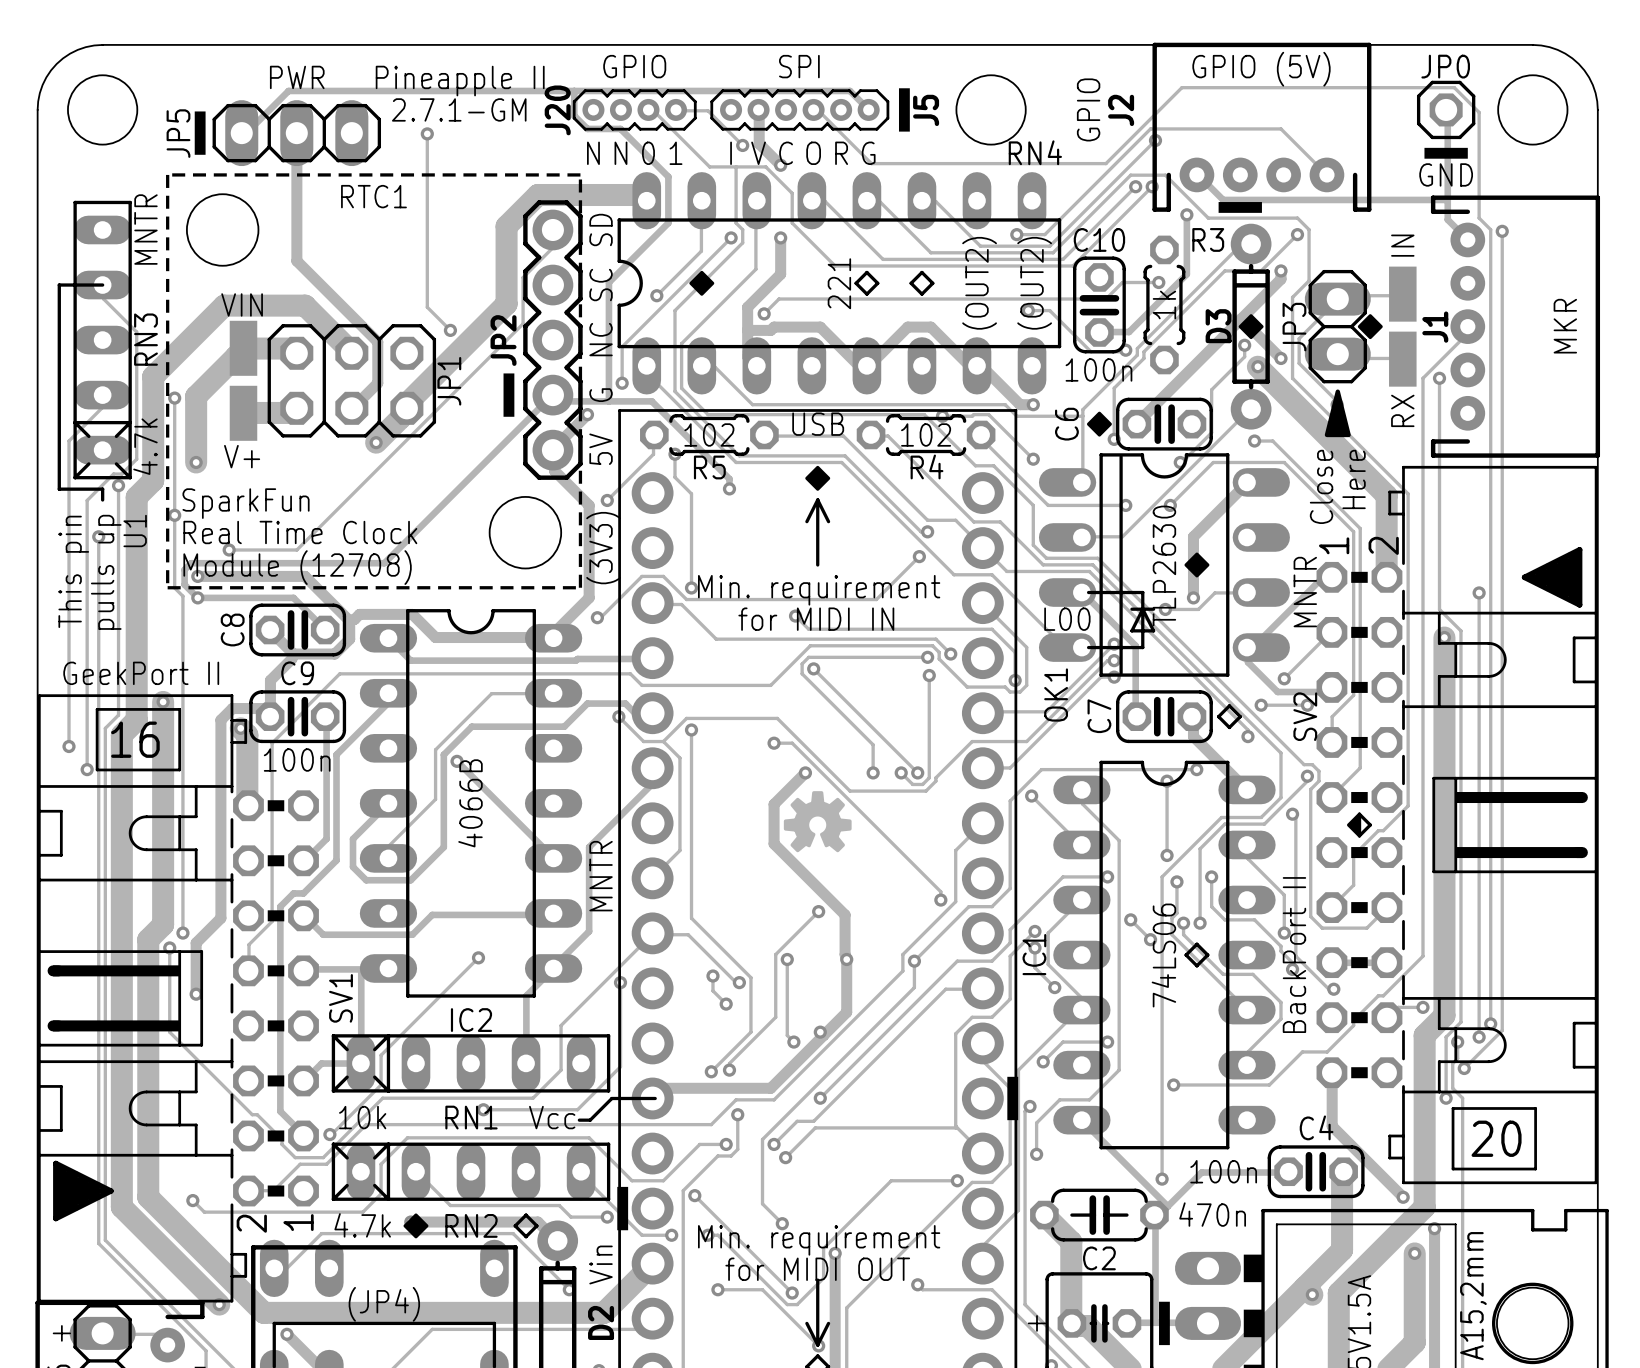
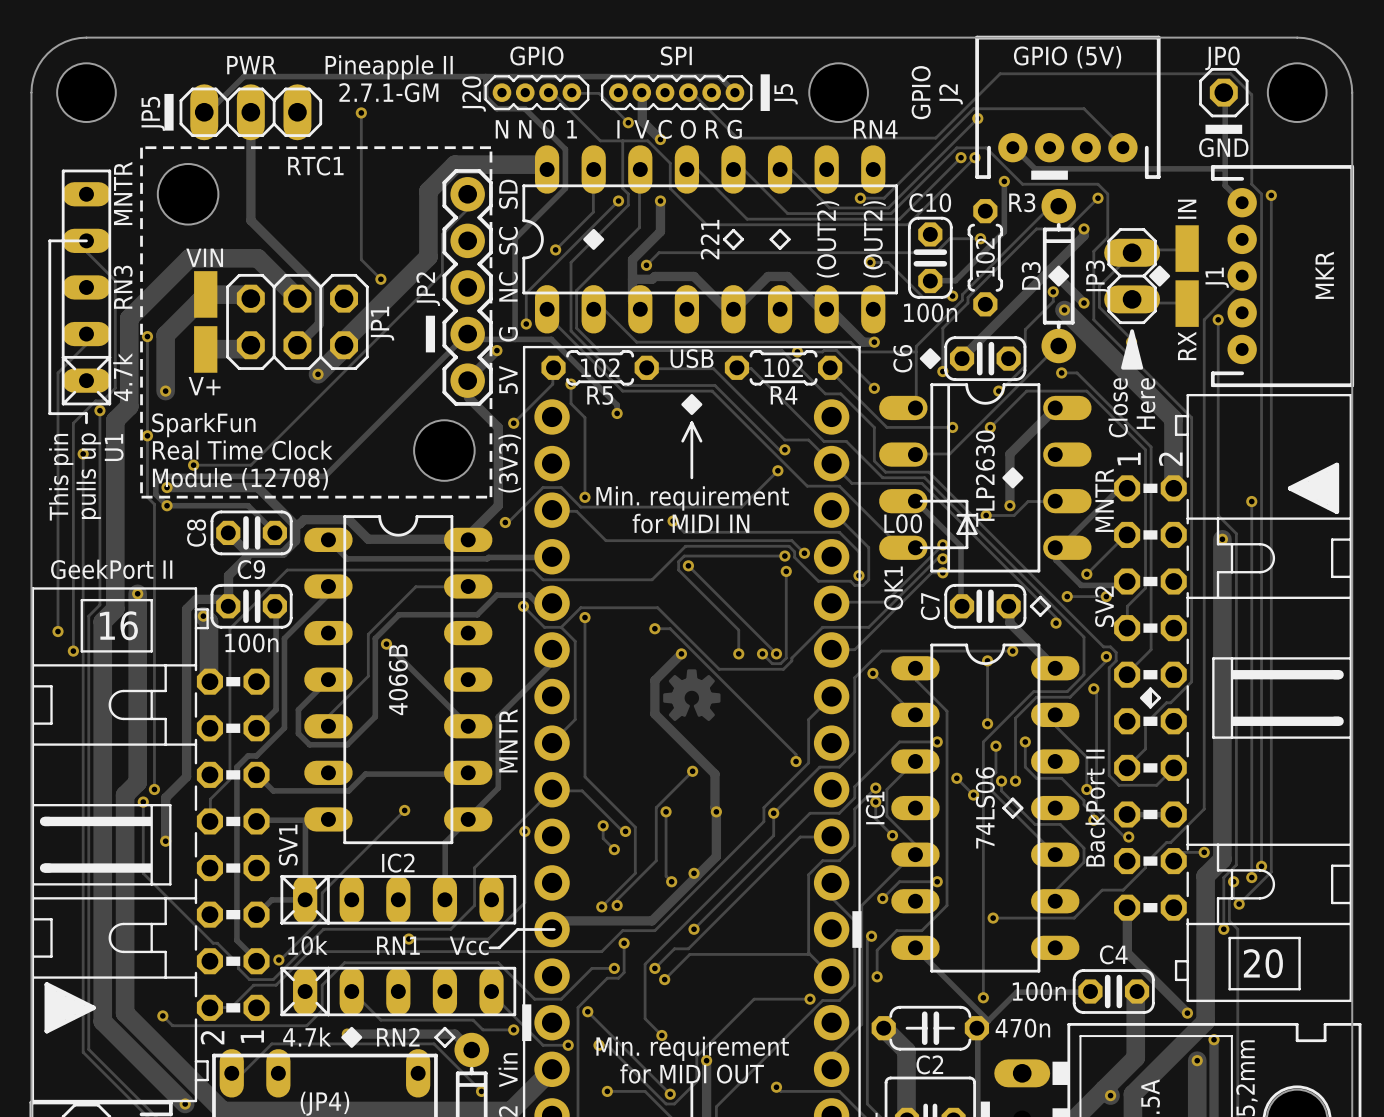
text: 1k (1164, 304) -> 102 (985, 257)

